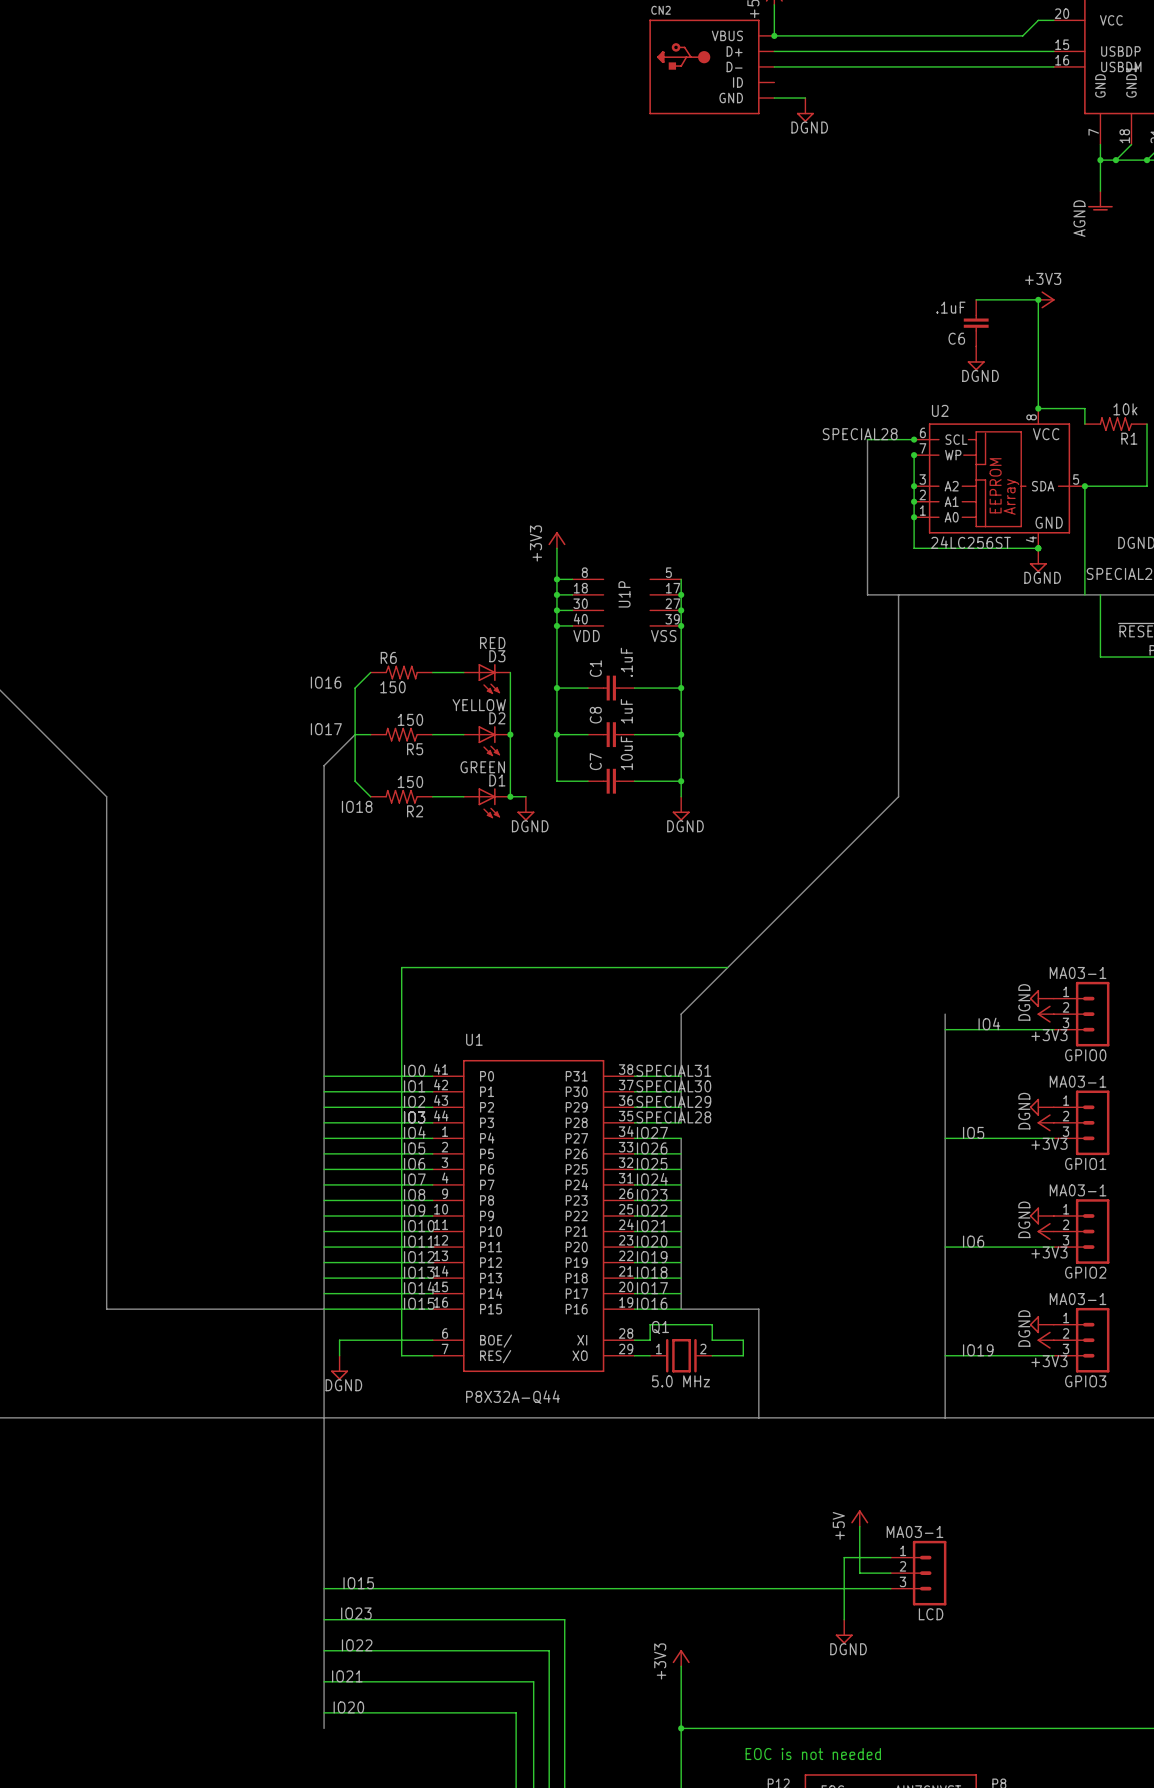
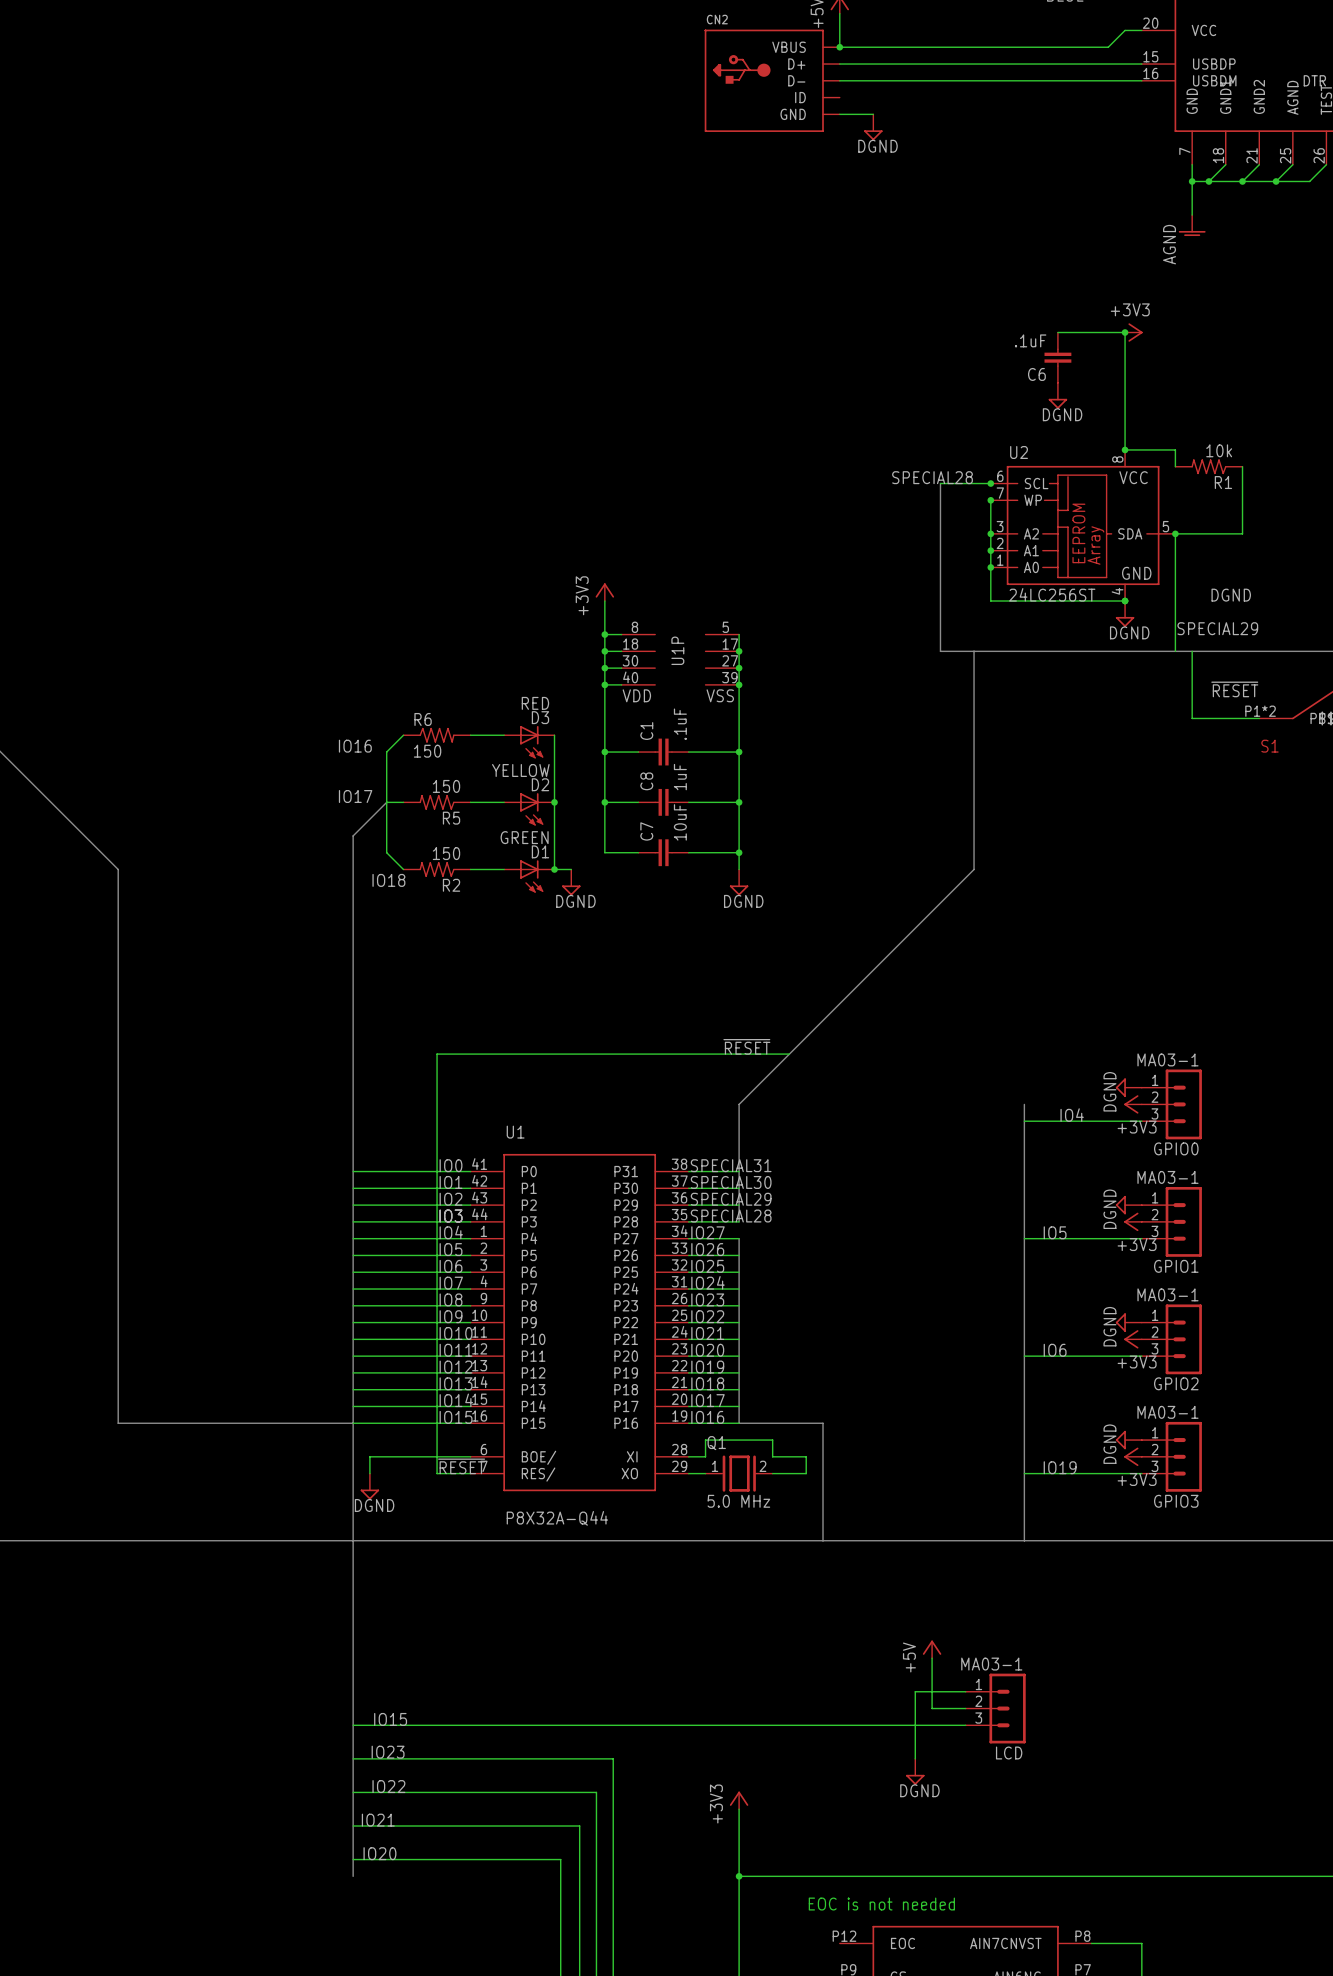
label: none -> ~{RESET} (746, 1046)
label: none -> ~{RESET} (461, 1466)

